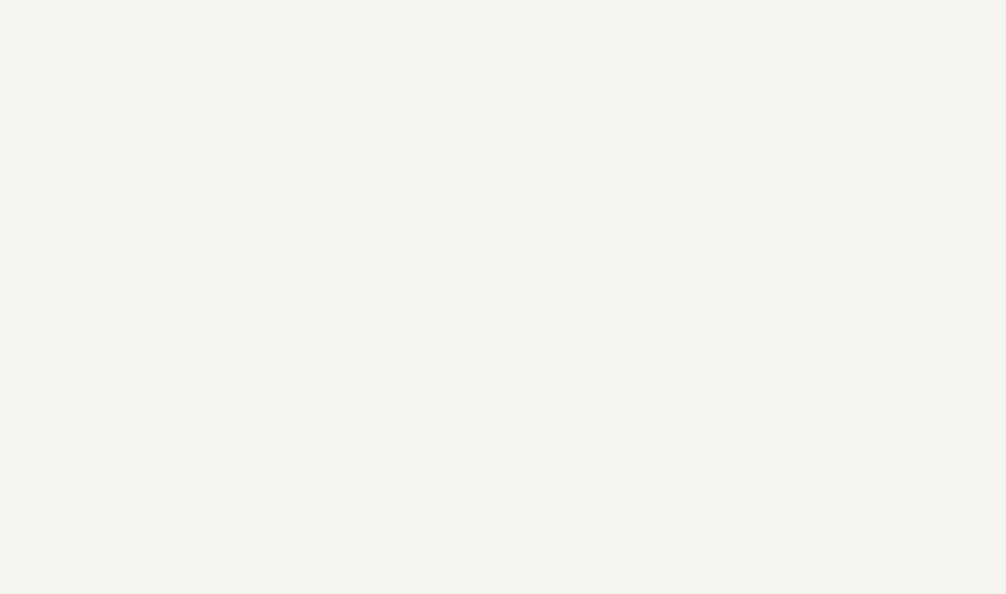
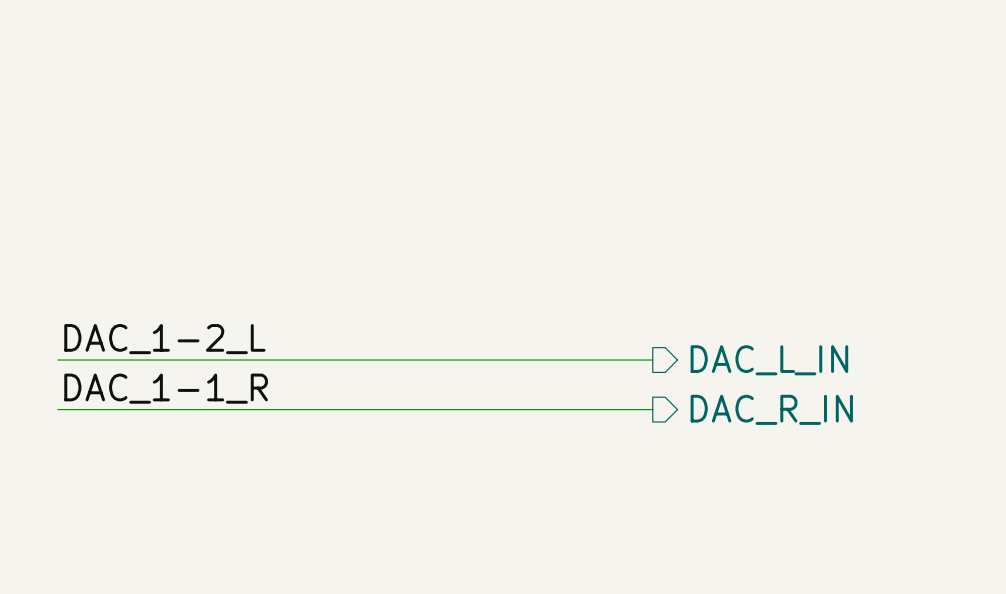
label: none -> DAC_1-2_L (164, 339)
wire: none -> (57, 360) (652, 360)
sheet pin: none -> DAC_L_IN (769, 360)
label: none -> DAC_1-1_R (166, 388)
wire: none -> (57, 409) (652, 409)
sheet pin: none -> DAC_R_IN (771, 409)

